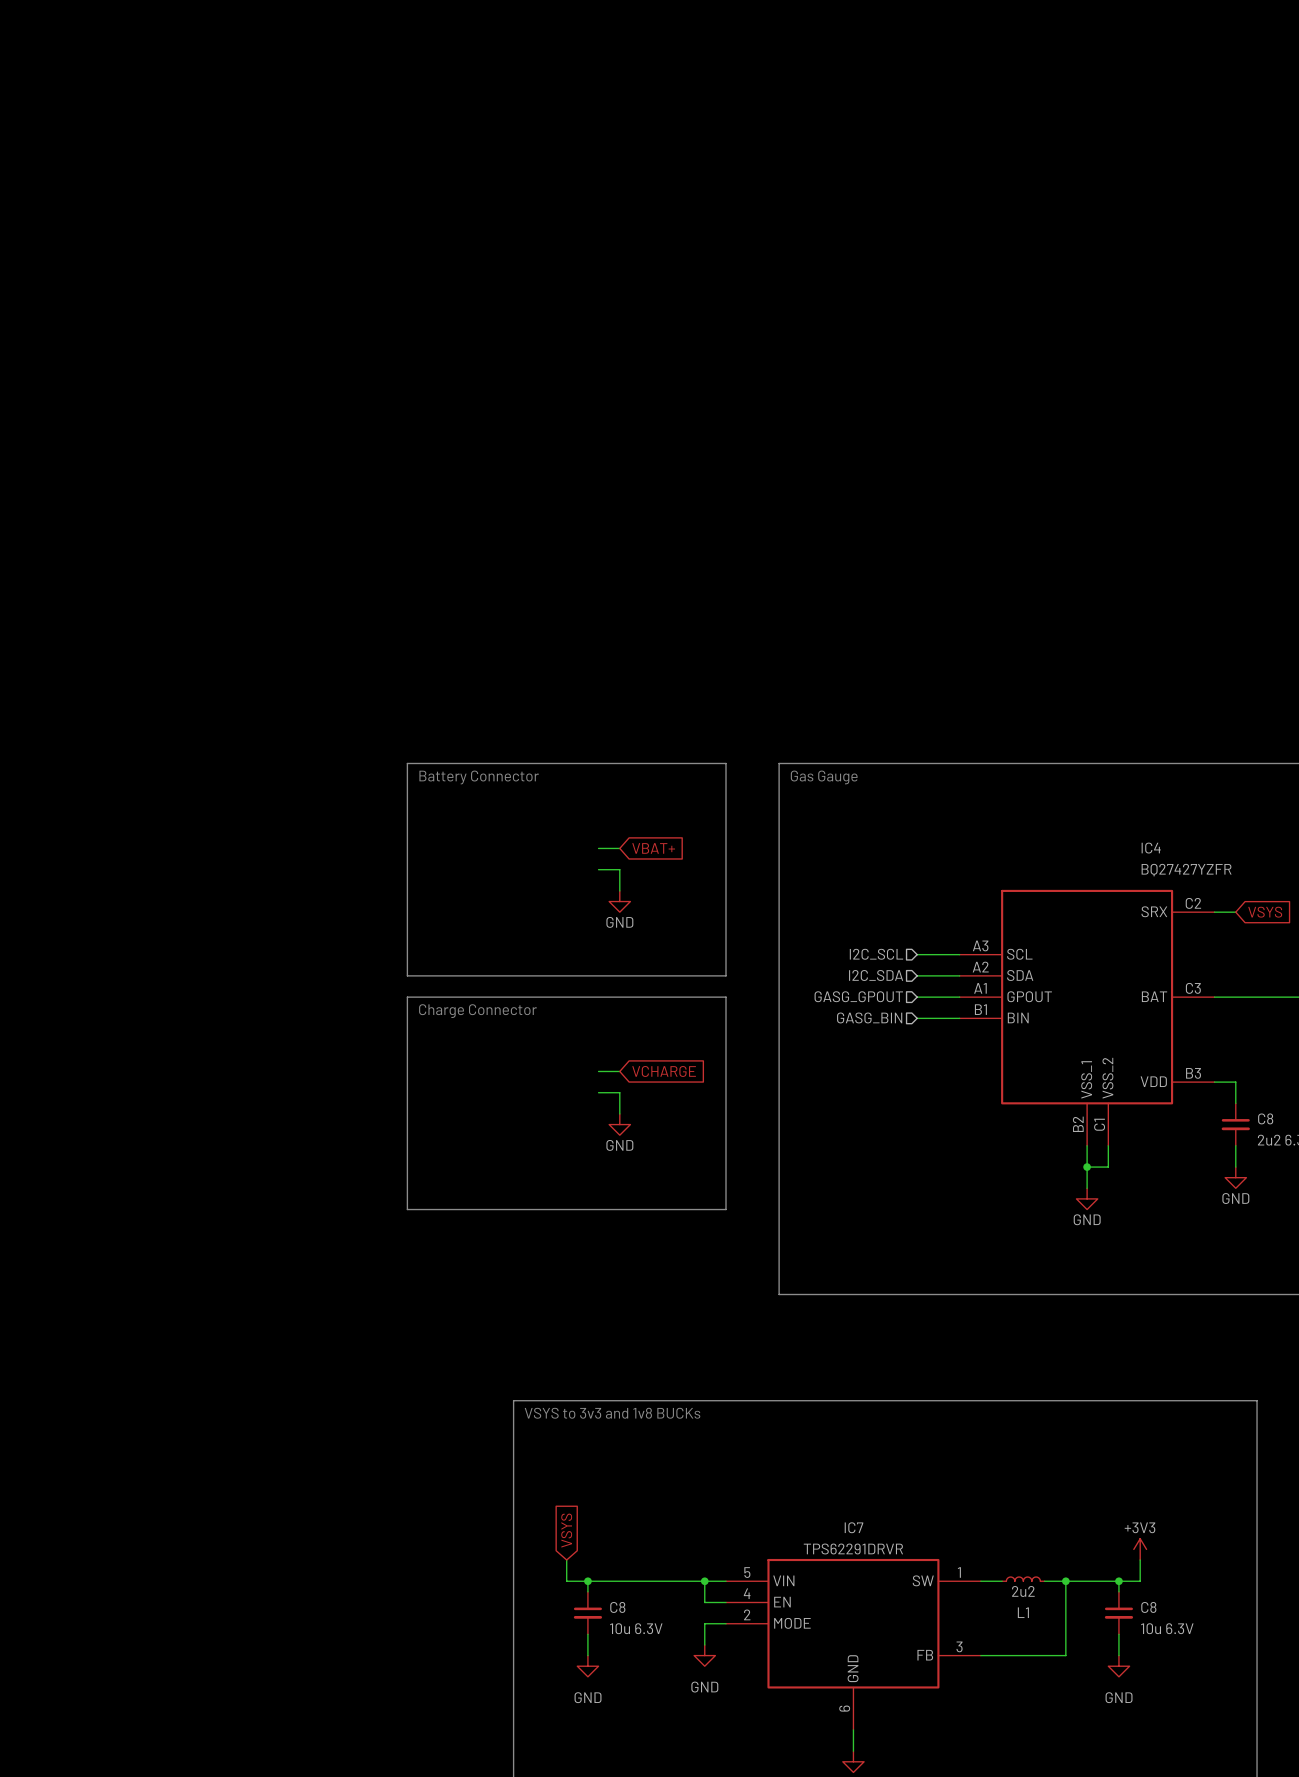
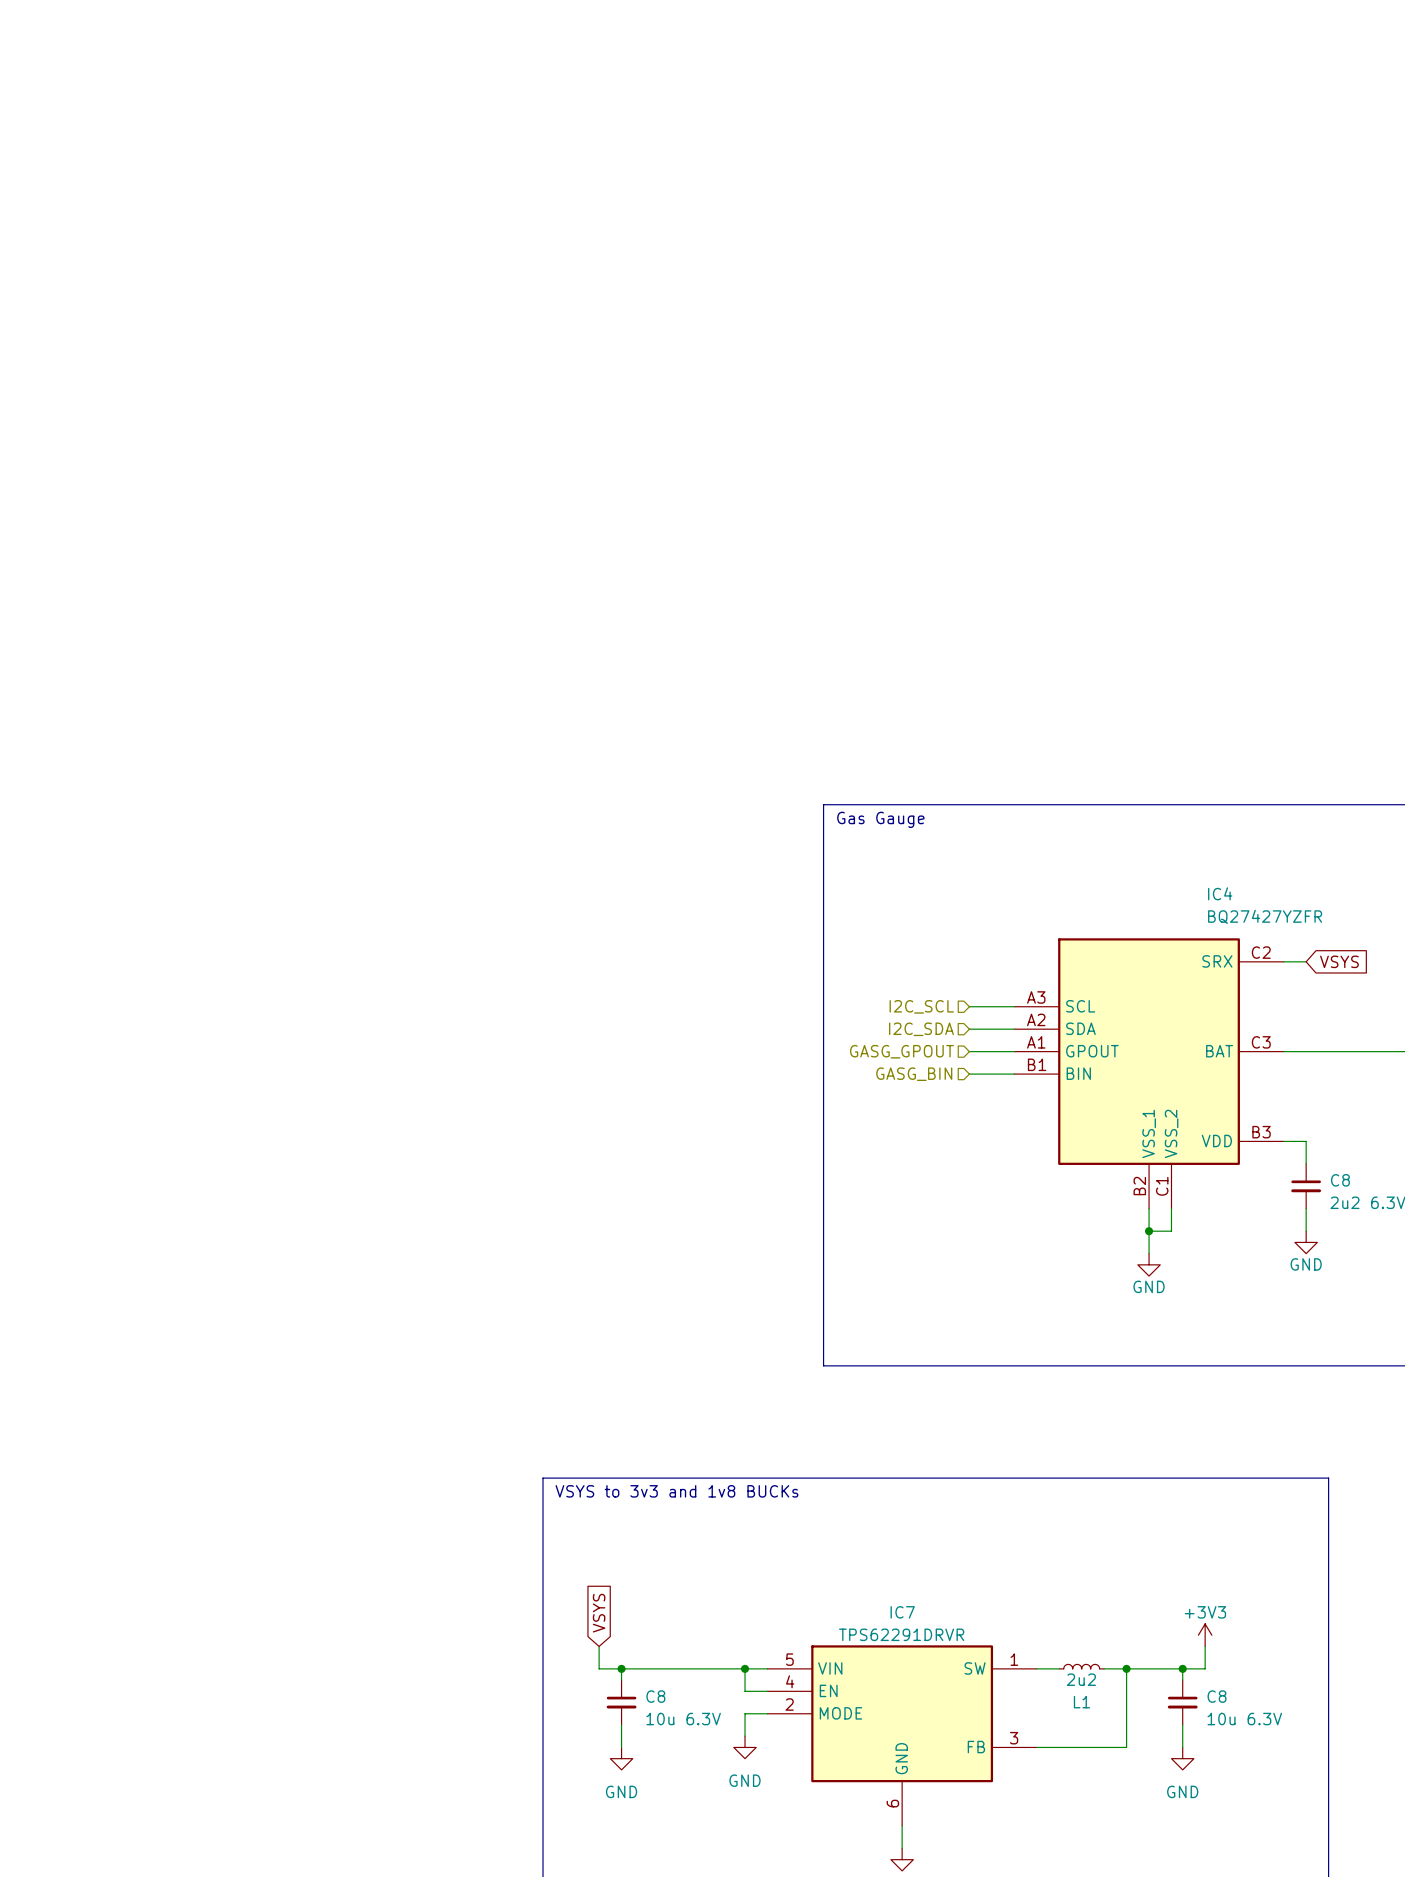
line: (407, 763) (407, 975) (726, 975) (726, 763) (407, 763) -> none
text: Battery Connector (479, 777) -> none
wire: (598, 848) (619, 848) -> none
global label: VBAT+ (653, 848) -> none
wire: (598, 869) (619, 869) (619, 890) -> none
power symbol: GND (619, 901) -> none
line: (407, 997) (407, 1209) (726, 1209) (726, 997) (407, 997) -> none
text: Charge Connector (477, 1011) -> none
wire: (598, 1071) (619, 1071) -> none
global label: VCHARGE (664, 1071) -> none
wire: (598, 1092) (619, 1092) (619, 1113) -> none
power symbol: GND (619, 1124) -> none

